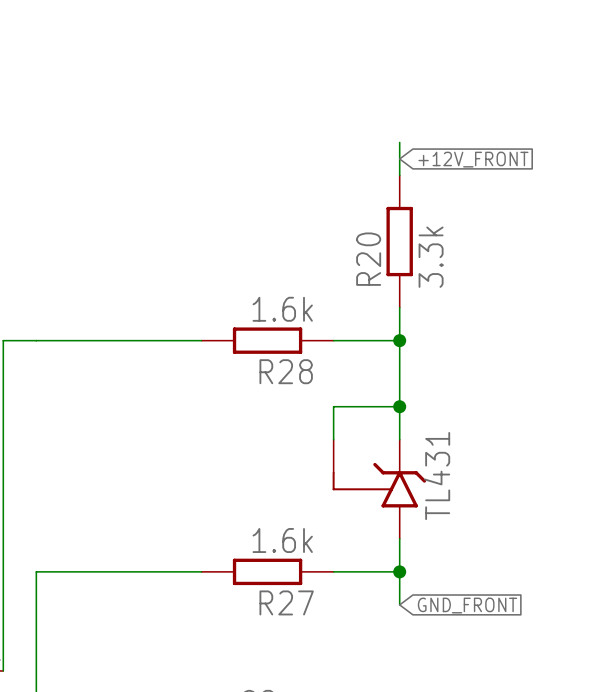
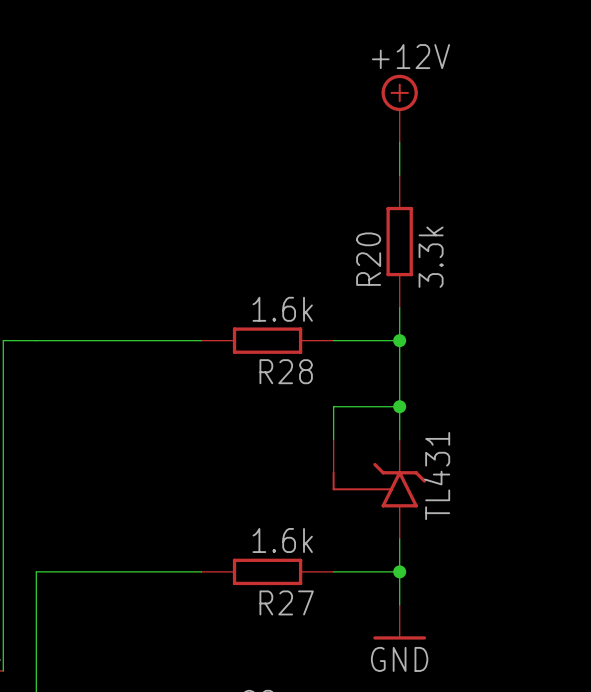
power symbol: none -> +12V (399, 108)
global label: +12V_FRONT (473, 159) -> none
global label: GND_FRONT (467, 605) -> none
power symbol: none -> GND (399, 622)

